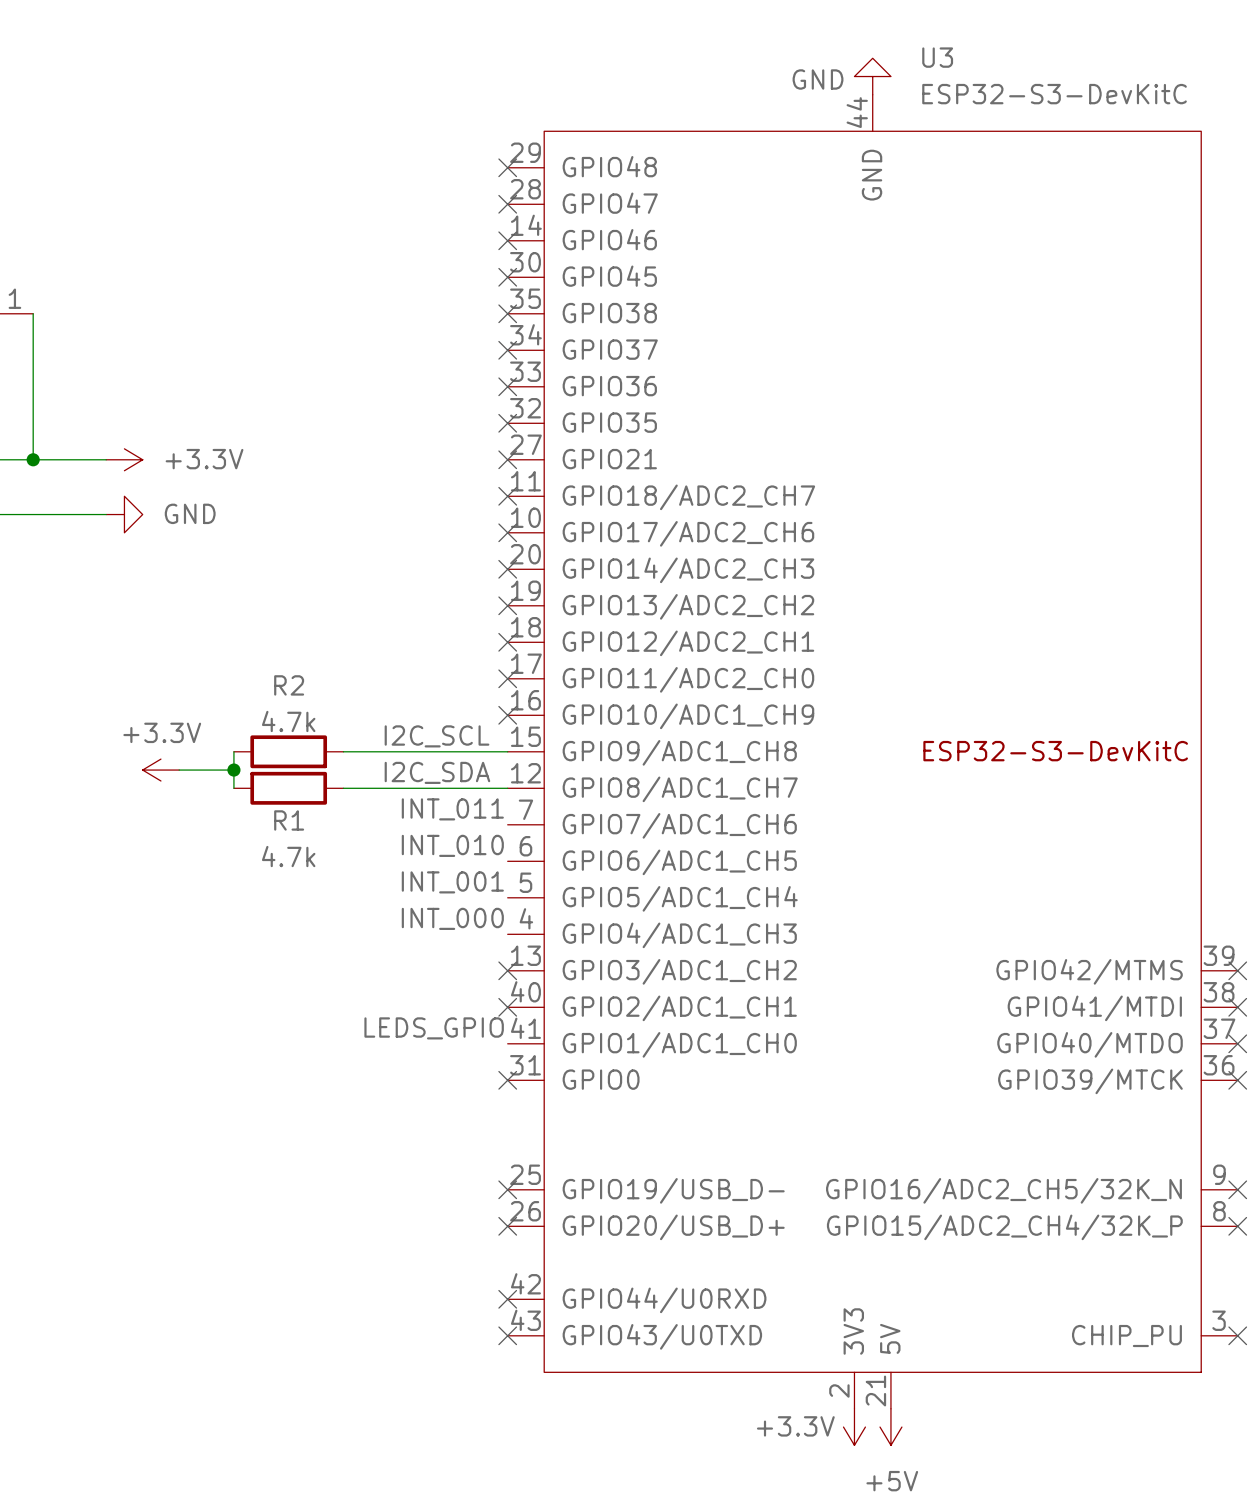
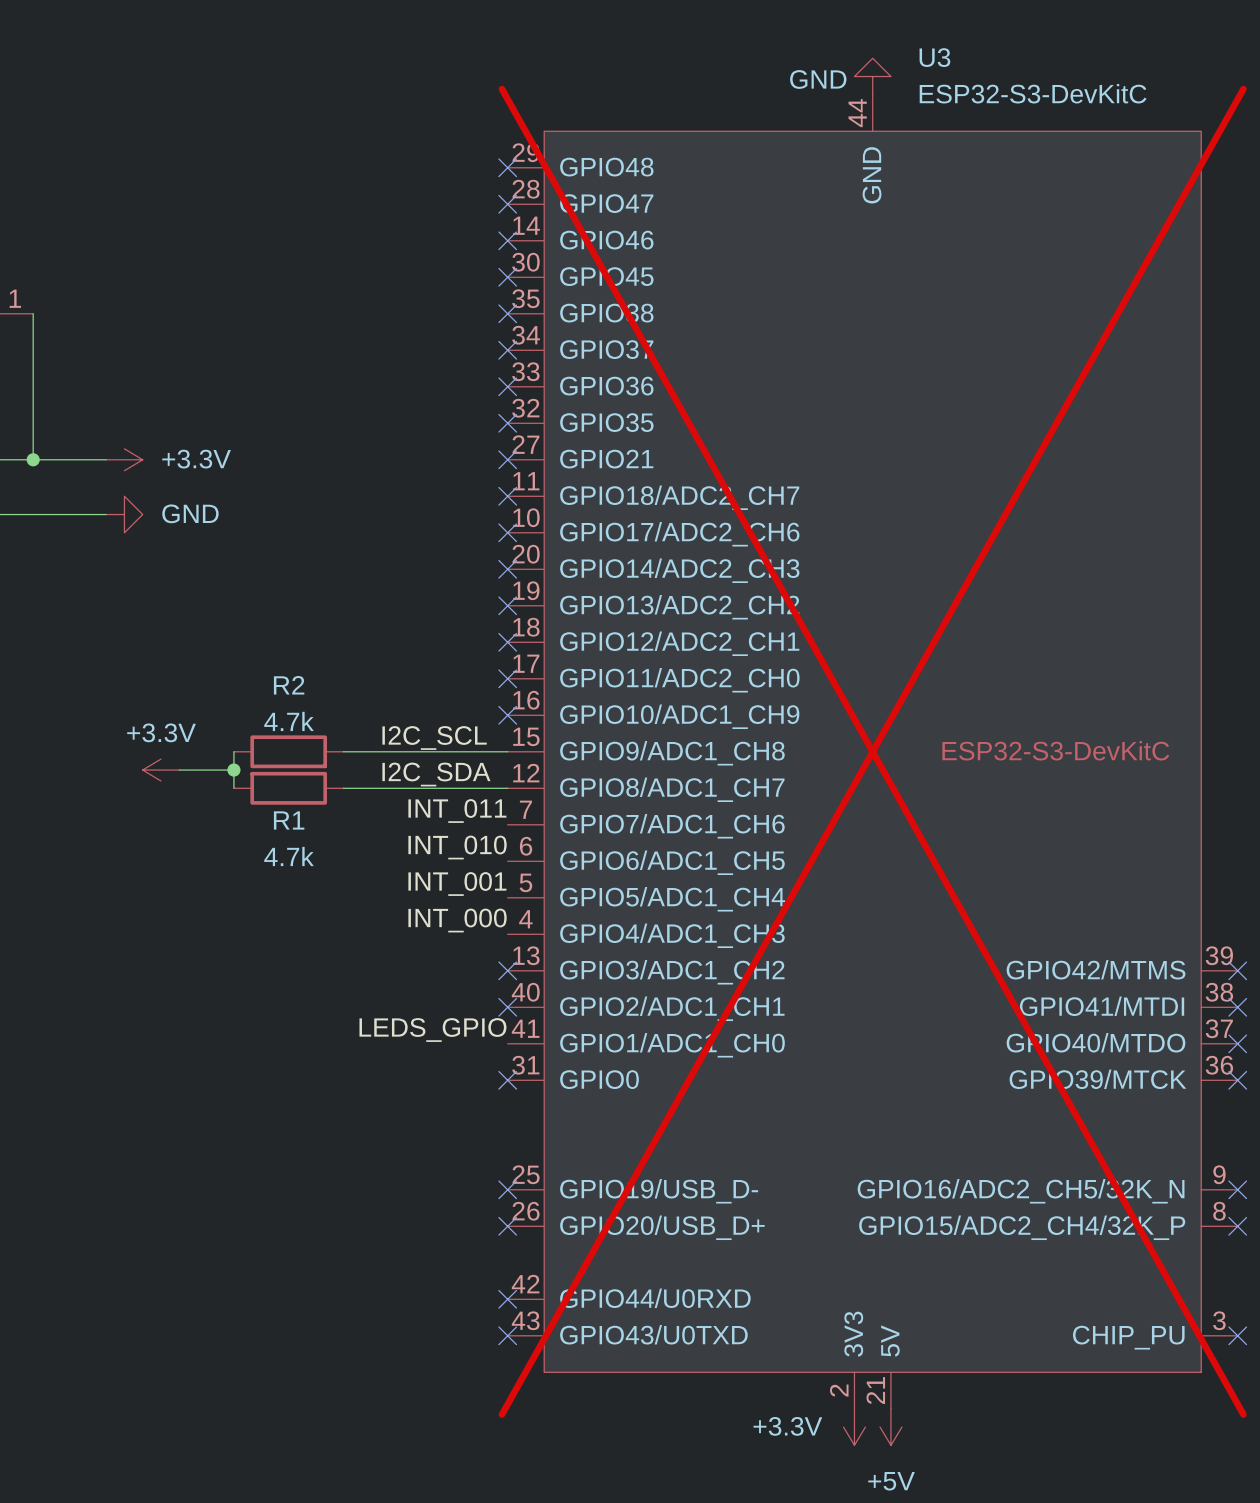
U3 do-not-place cross: none -> (872, 751)

